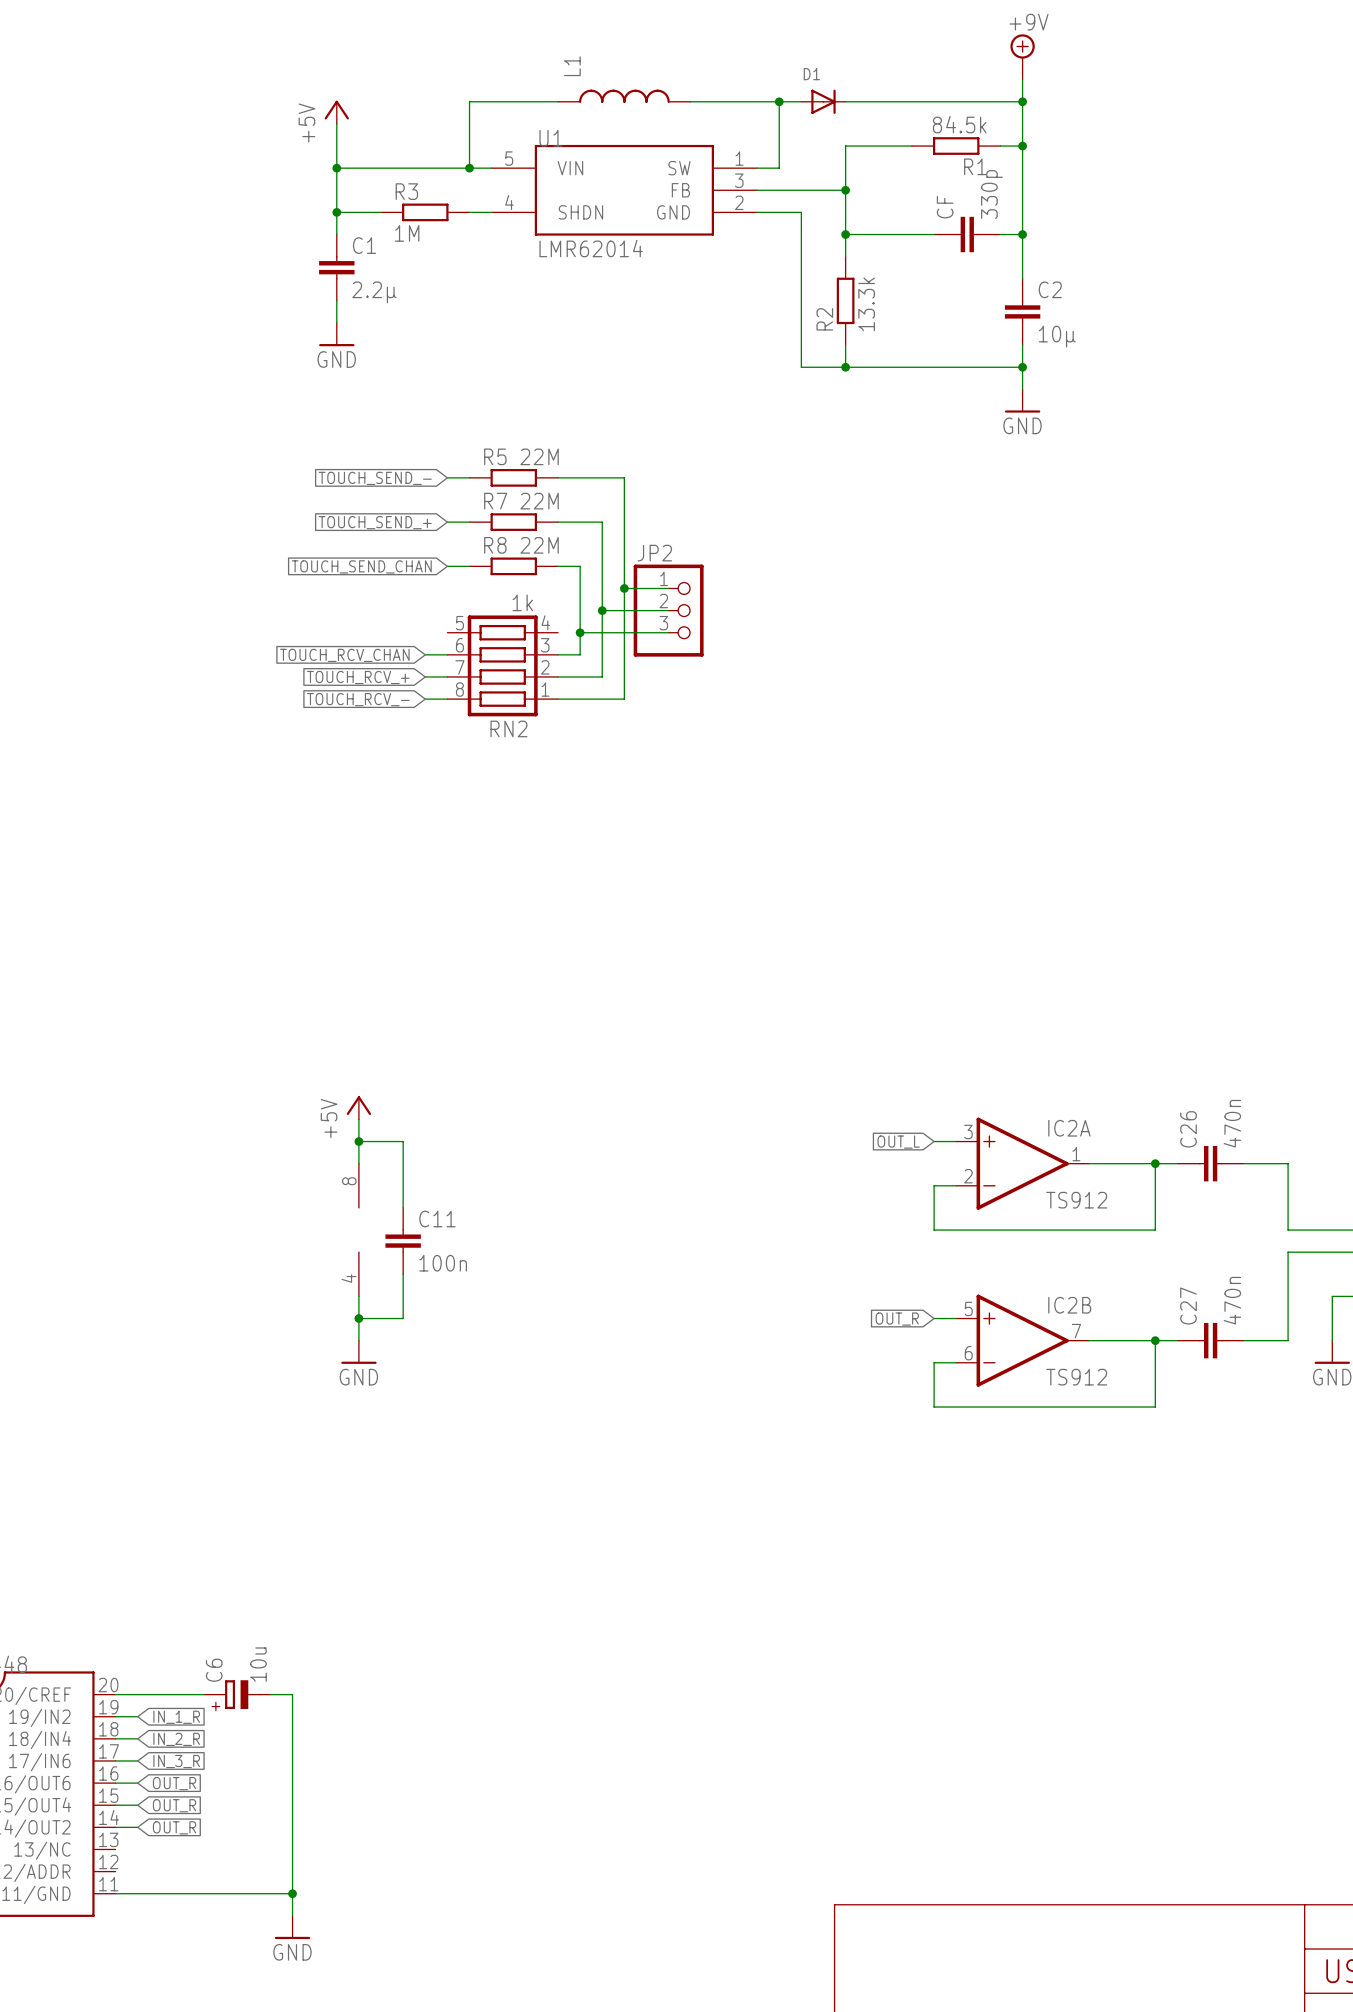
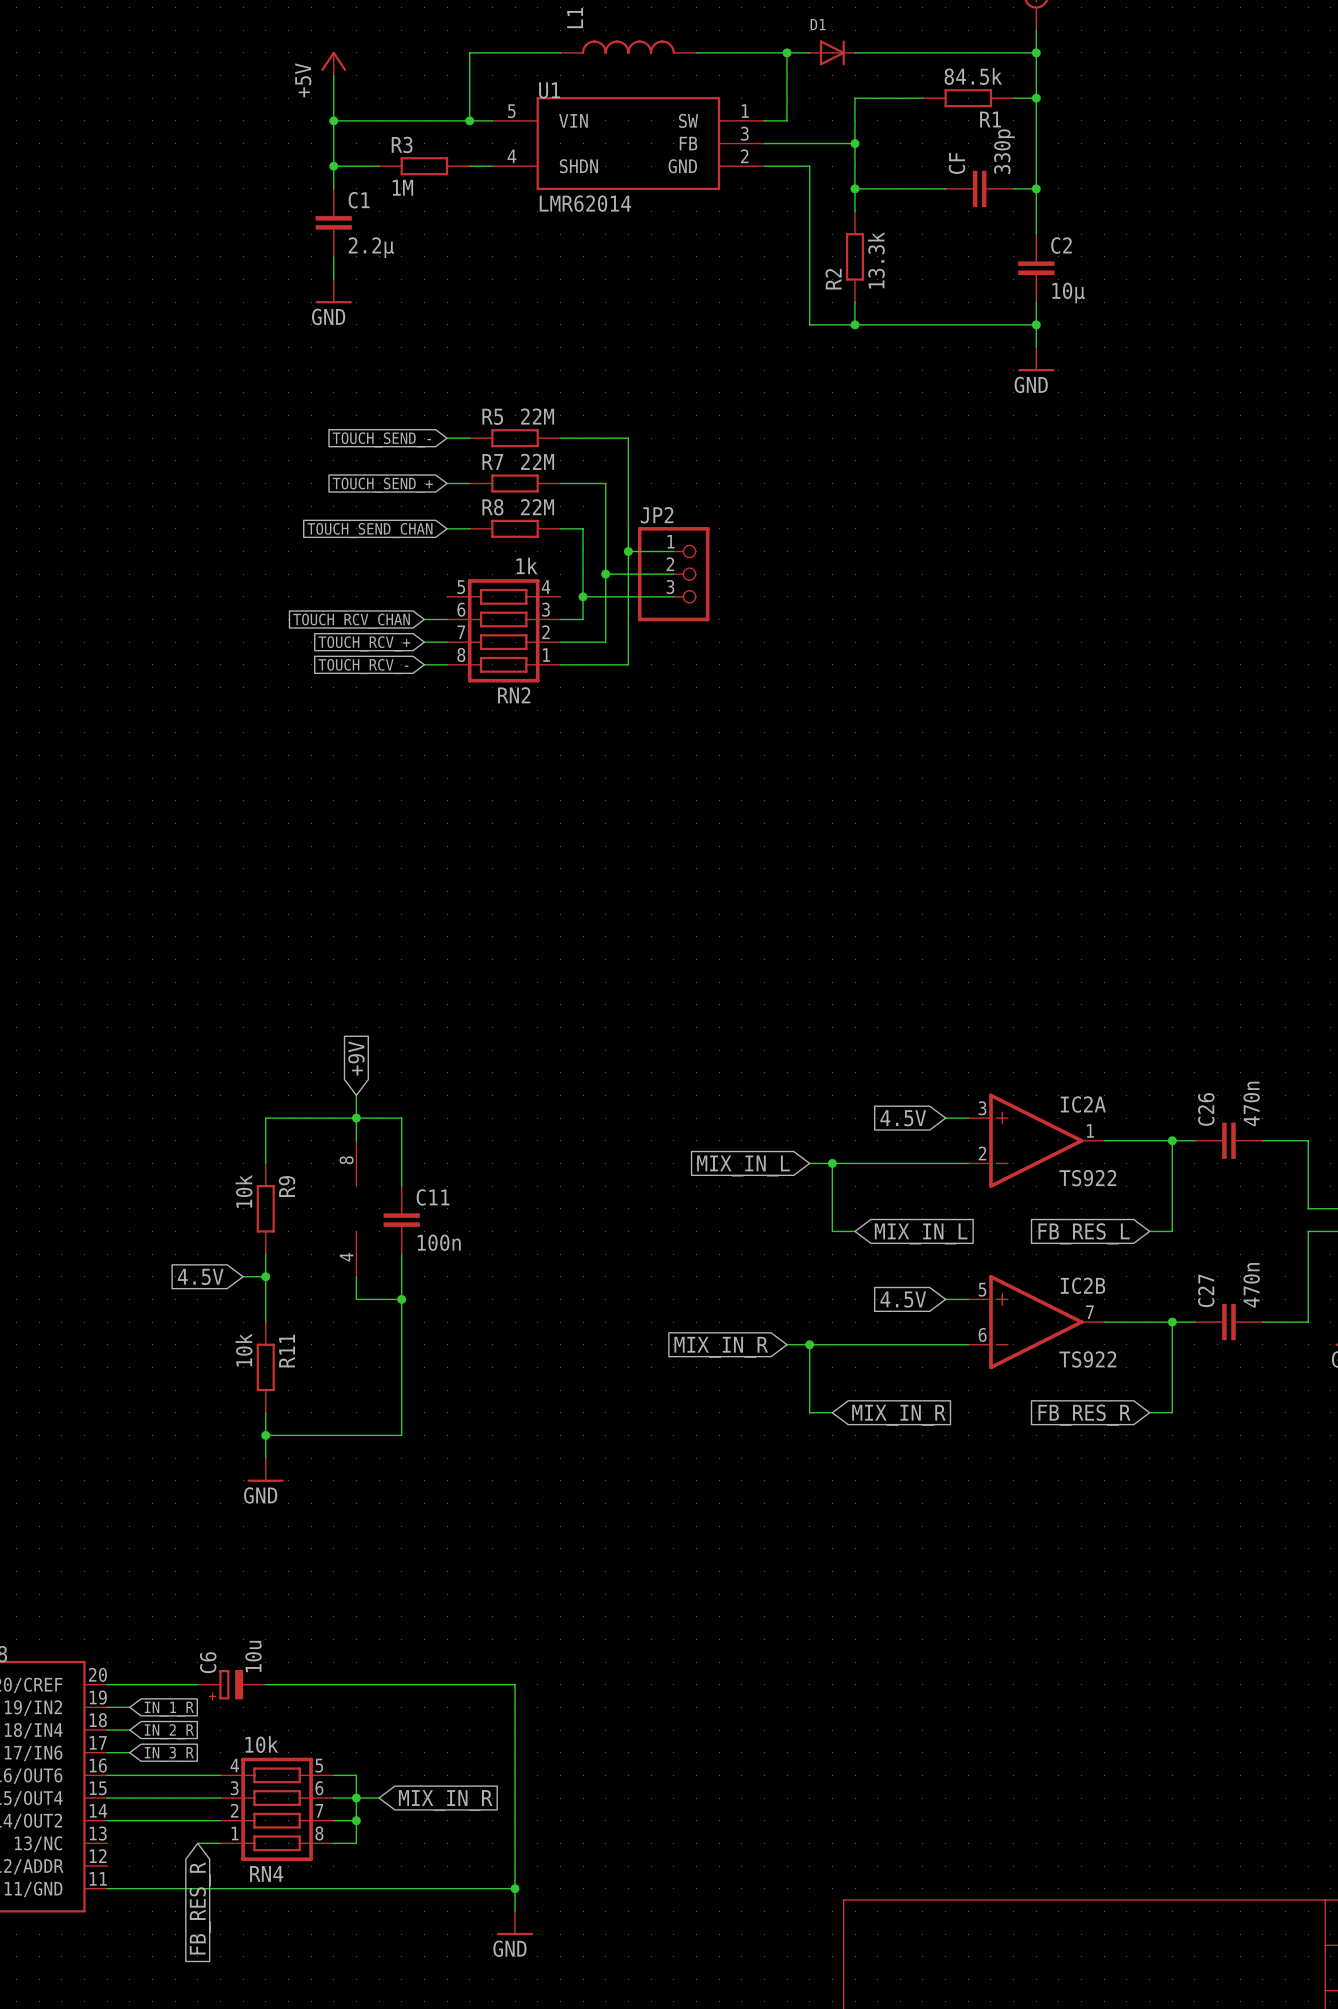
global label: none -> +9V (356, 1058)
power symbol: +5V (358, 1107) -> none
wire: none -> (356, 1118) (265, 1118) (265, 1163)
global label: OUT_L (898, 1142) -> 4.5V (903, 1118)
wire: none -> (809, 1163) (945, 1163)
wire: none -> (832, 1163) (832, 1231) (855, 1231)
junction: none -> (832, 1163)
wire: (934, 1185) (934, 1230) (1155, 1230) -> (1149, 1231) (1172, 1231) (1172, 1208)
global label: none -> MIX_IN_L (743, 1165)
IC2A value: TS912 (1076, 1200) -> TS922 (1087, 1178)
R9: none -> 10k (265, 1208)
global label: none -> MIX_IN_L (921, 1233)
global label: none -> FB_RES_L (1084, 1233)
wire: none -> (265, 1254) (265, 1322)
global label: none -> 4.5V (200, 1276)
wire: none -> (243, 1276) (265, 1276)
junction: none -> (265, 1276)
wire: (358, 1318) (358, 1340) -> none
junction position: (358, 1318) -> (401, 1299)
wire: none -> (401, 1299) (401, 1435) (265, 1435)
global label: OUT_R (897, 1319) -> 4.5V (903, 1299)
power symbol position: GND (358, 1352) -> GND (265, 1469)
wire: none -> (787, 1344) (945, 1344)
wire: none -> (809, 1344) (809, 1412) (832, 1412)
junction: none -> (809, 1344)
wire: (934, 1362) (934, 1407) (1155, 1407) -> (1149, 1412) (1172, 1412) (1172, 1390)
global label: none -> MIX_IN_R (721, 1347)
IC2B value: TS912 (1076, 1377) -> TS922 (1087, 1359)
R11: none -> 10k (265, 1367)
wire: none -> (265, 1412) (265, 1458)
global label: none -> MIX_IN_R (898, 1415)
global label: none -> FB_RES_R (1084, 1415)
junction: none -> (265, 1435)
wire: (292, 1694) (292, 1915) -> (288, 1684) (515, 1684) (515, 1911)
wire: none -> (129, 1775) (220, 1775)
global label: OUT_R (174, 1783) -> none
wire: none -> (333, 1775) (356, 1775) (356, 1843) (333, 1843)
wire: none -> (129, 1798) (220, 1798)
global label: OUT_R (174, 1805) -> none
wire: none -> (333, 1798) (379, 1798)
junction: none -> (356, 1798)
global label: none -> MIX_IN_R (445, 1800)
RN4: none -> 10k (277, 1809)
wire: none -> (129, 1820) (220, 1820)
global label: OUT_R (174, 1827) -> none
wire: none -> (333, 1820) (356, 1820)
junction: none -> (356, 1820)
wire: none -> (197, 1843) (220, 1843)
wire: none -> (288, 1888) (515, 1888)
junction: (292, 1893) -> none
junction: none -> (515, 1888)
global label: none -> FB_RES_R (200, 1908)
power symbol: GND (292, 1927) -> none
power symbol: none -> GND (515, 1923)

